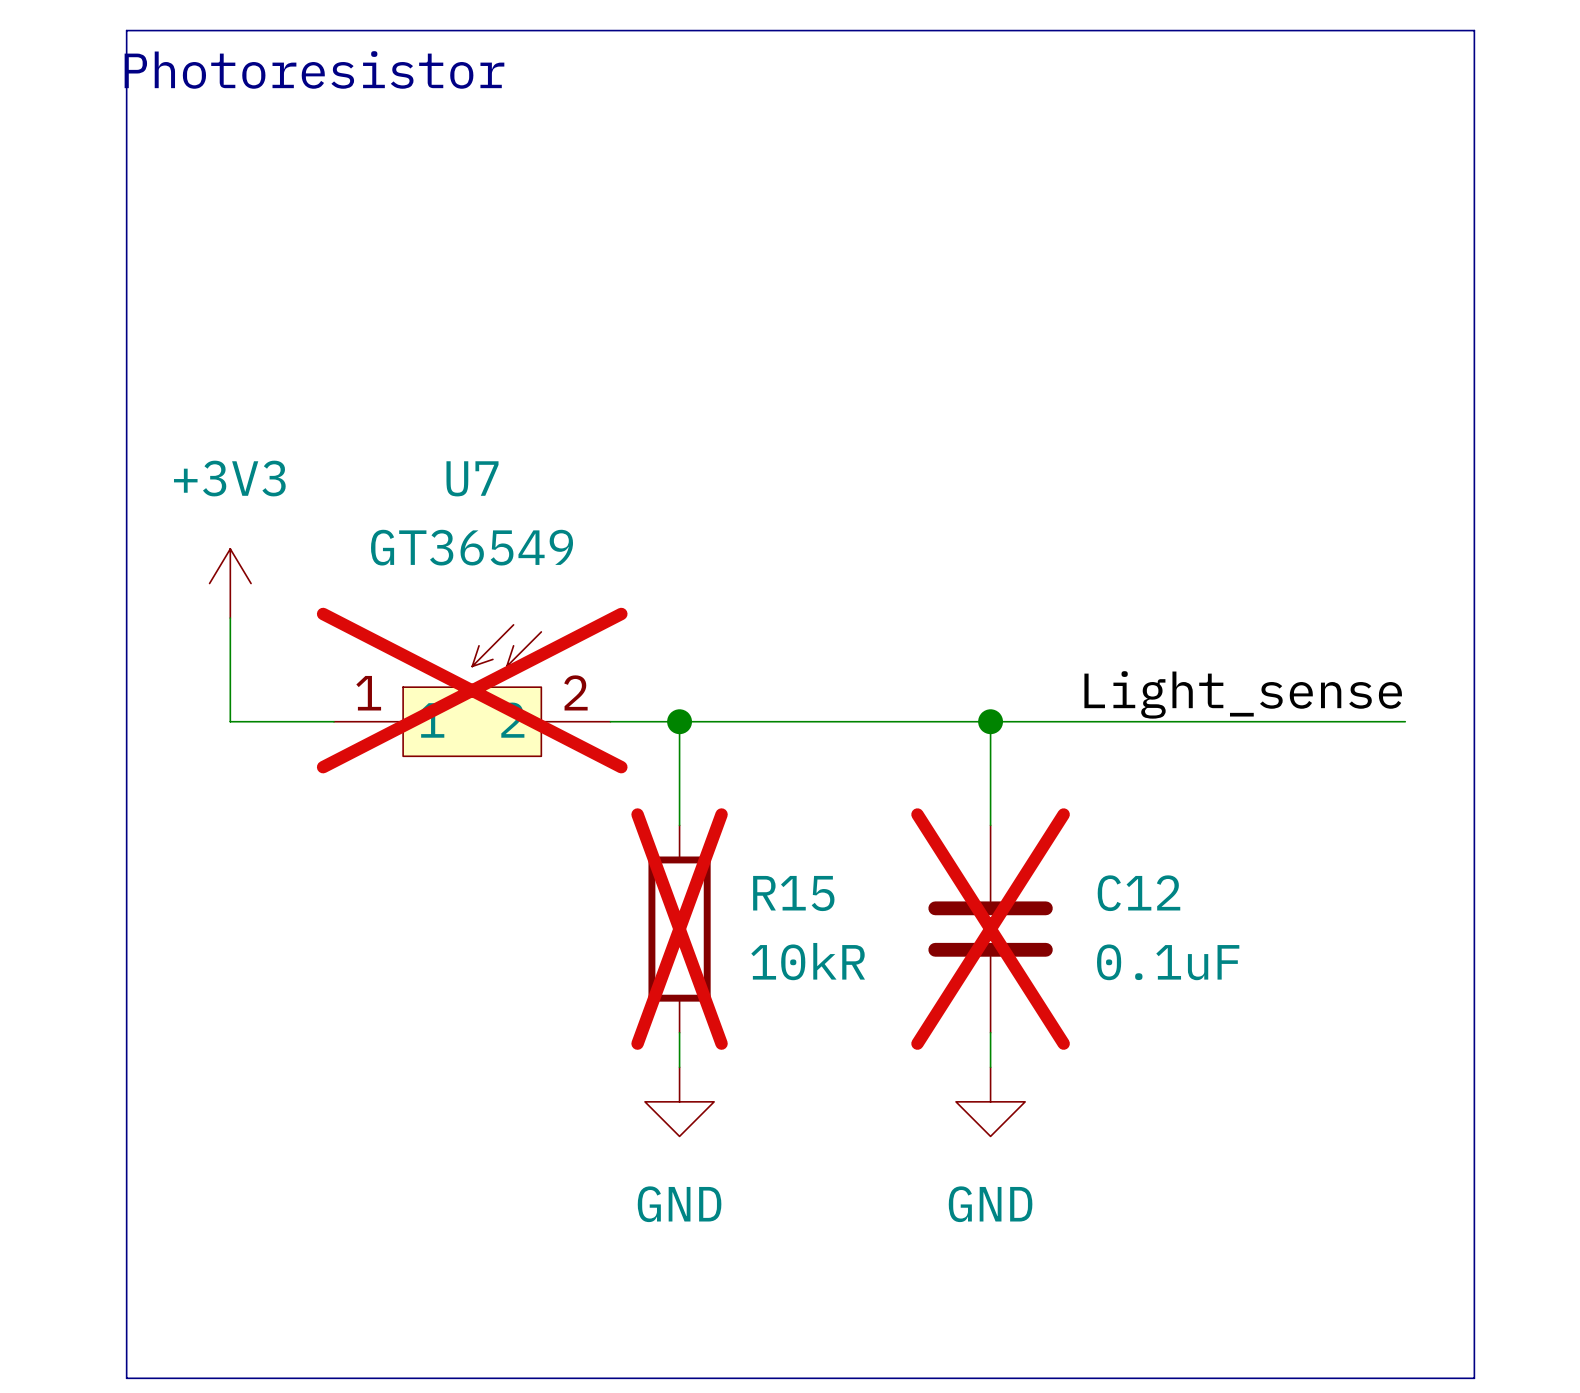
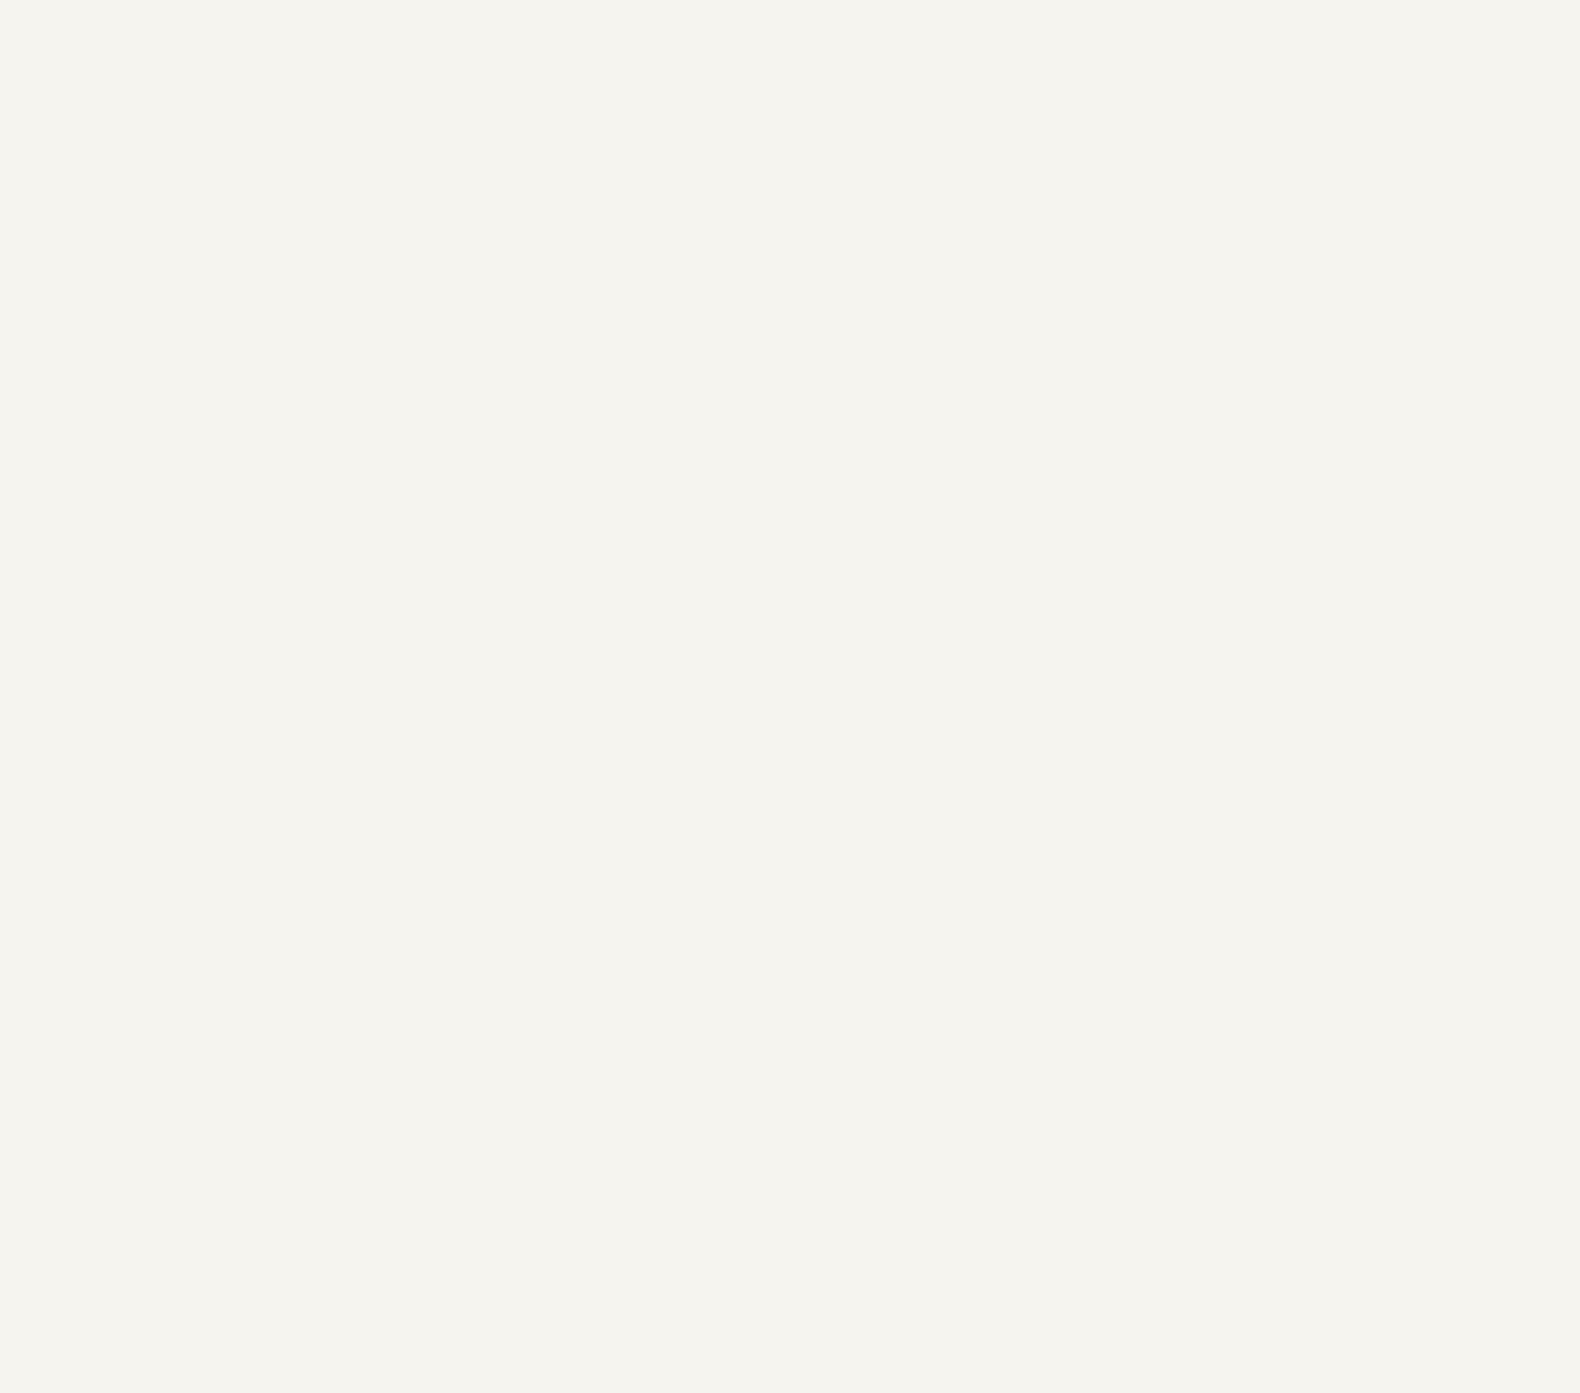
line: (126, 30) (126, 1378) (1474, 1378) (1474, 30) (126, 30) -> none
text: Photoresistor (314, 69) -> none
power symbol: +3V3 (230, 583) -> none
wire: (230, 618) (230, 721) (333, 721) -> none
U7: GT36549 (472, 690) -> none
label: Light_sense (1243, 694) -> none
wire: (610, 721) (1405, 721) -> none
wire: (679, 721) (679, 825) -> none
junction: (679, 721) -> none
wire: (990, 721) (990, 825) -> none
junction: (990, 721) -> none
R15: 10kR (679, 929) -> none
C12: 0.1uF (990, 929) -> none
wire: (679, 1032) (679, 1067) -> none
wire: (990, 1032) (990, 1067) -> none
power symbol: GND (679, 1101) -> none
power symbol: GND (990, 1101) -> none

